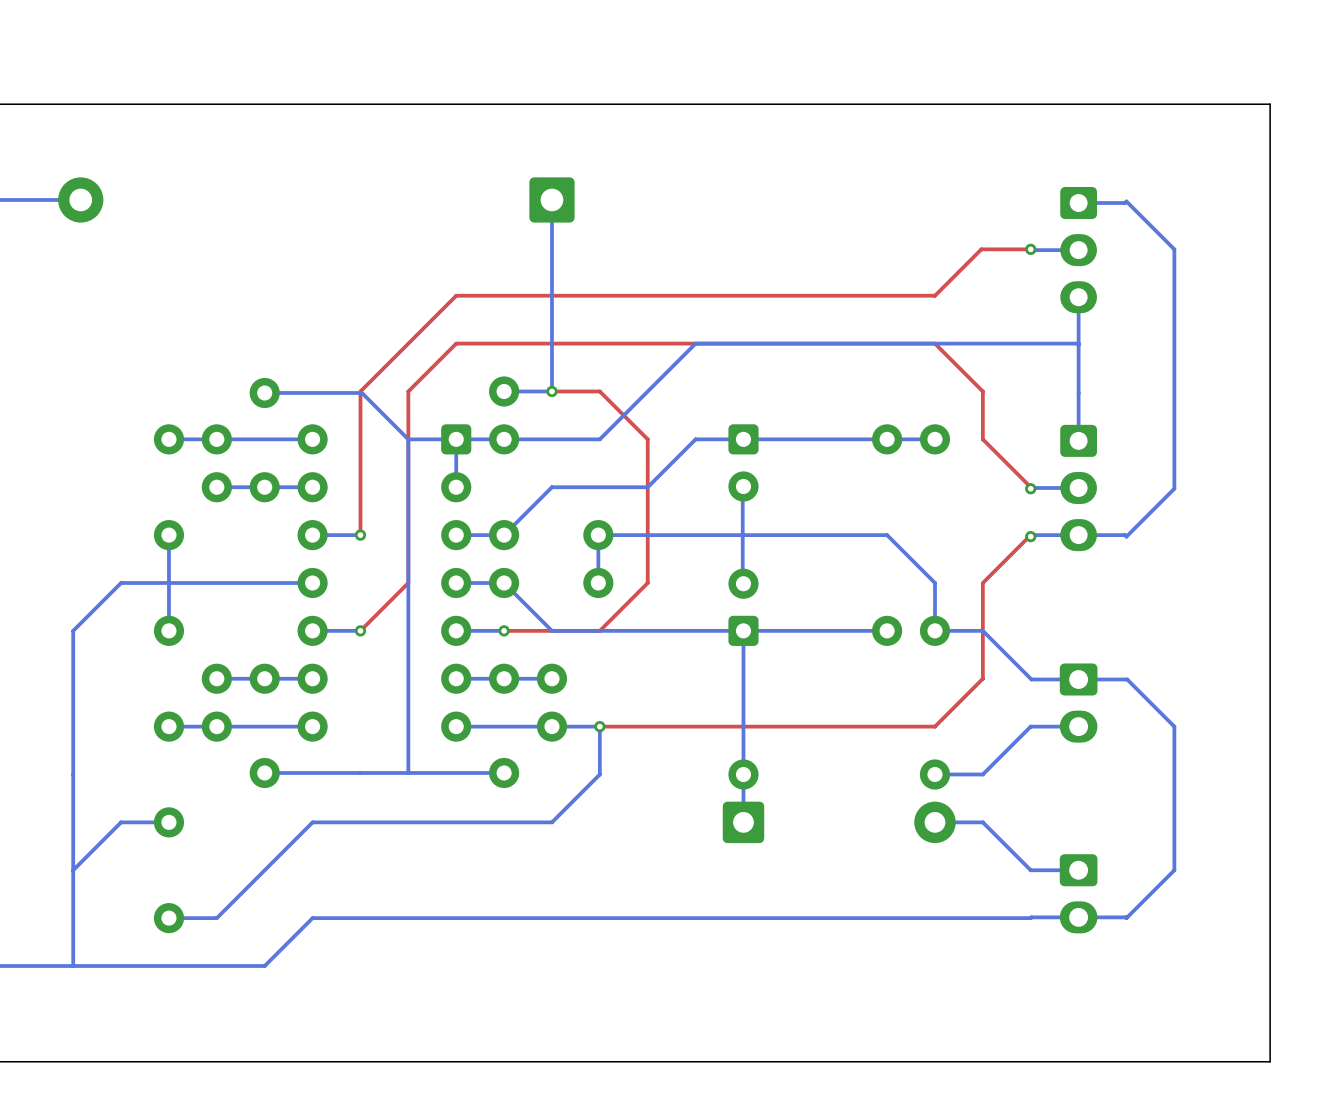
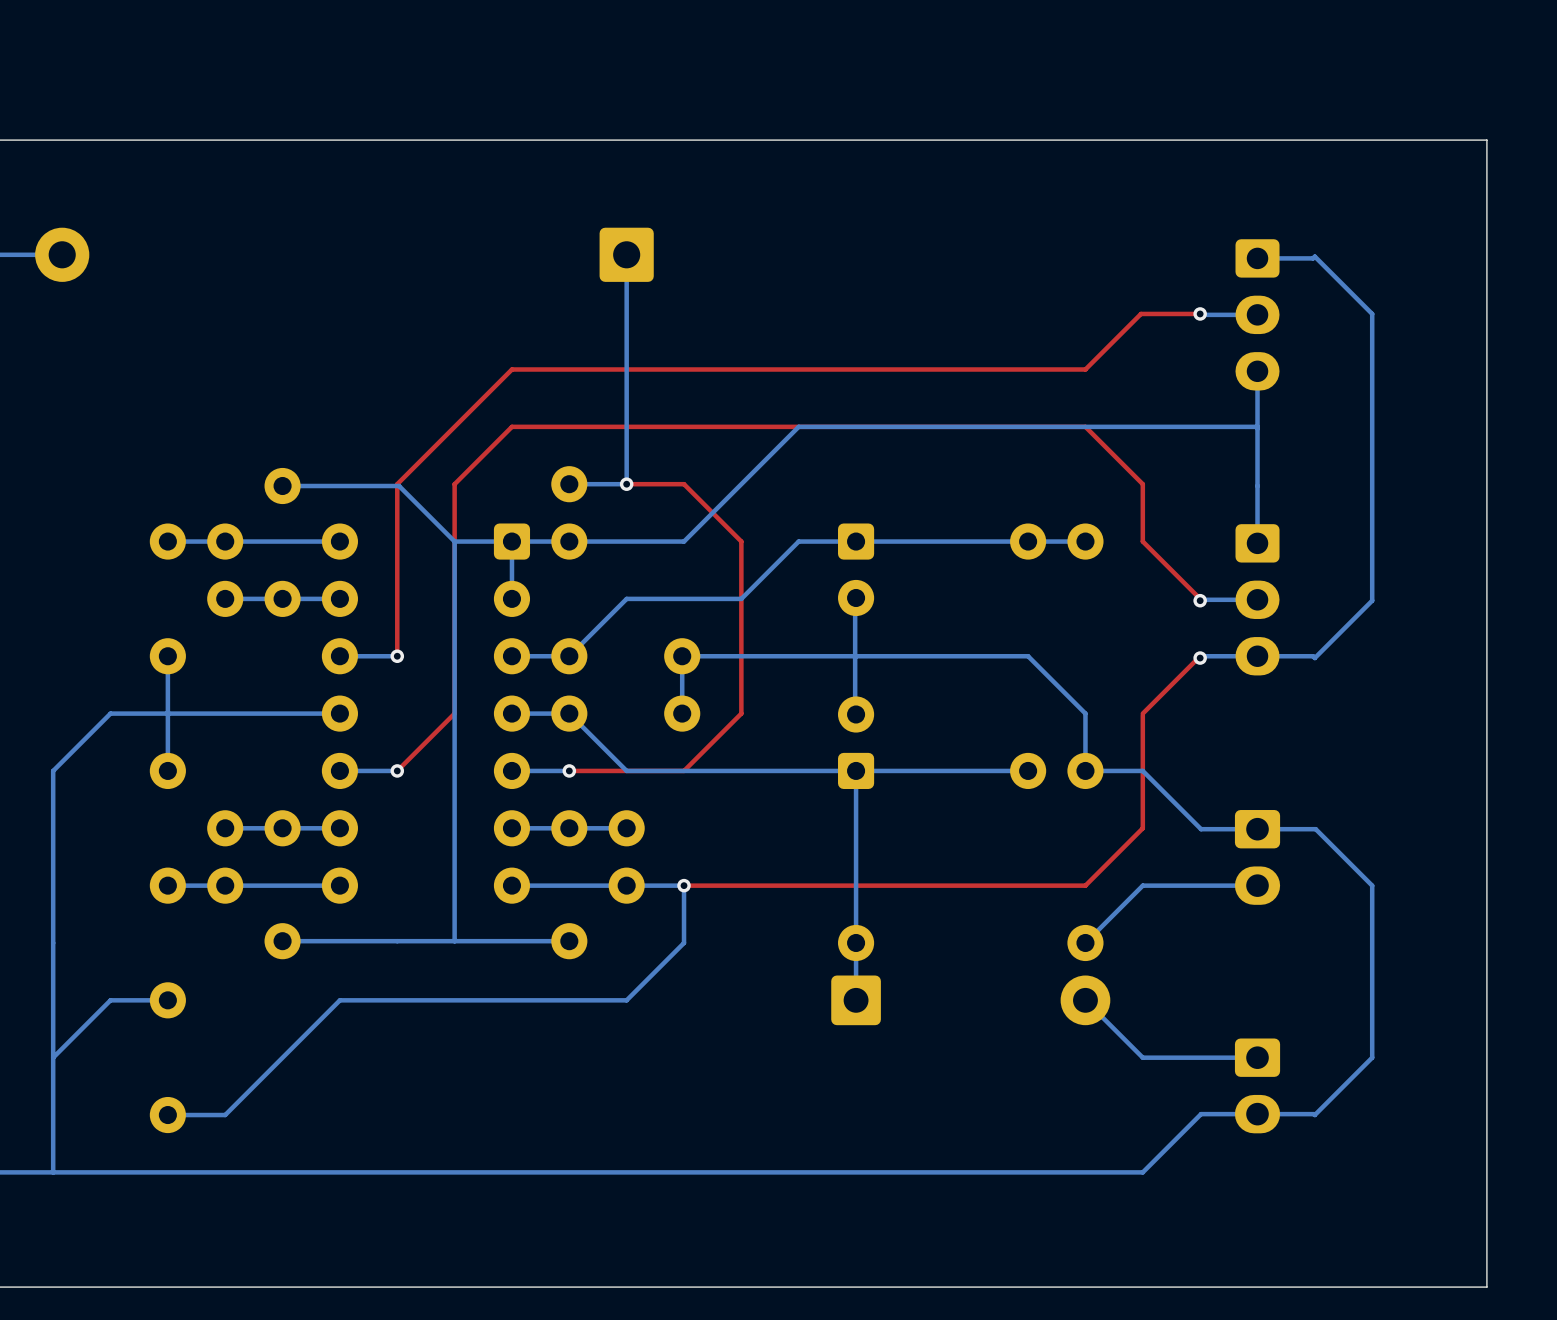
bottom track: (1030, 726) (982, 774) (934, 774) -> (1200, 885) (1142, 885) (1085, 942)
bottom track: (934, 822) (982, 822) (1030, 870) -> (1085, 1000) (1142, 1057) (1200, 1057)
bottom track: (1030, 918) (312, 918) (264, 966) -> (1200, 1115) (1142, 1172) (282, 1172)

